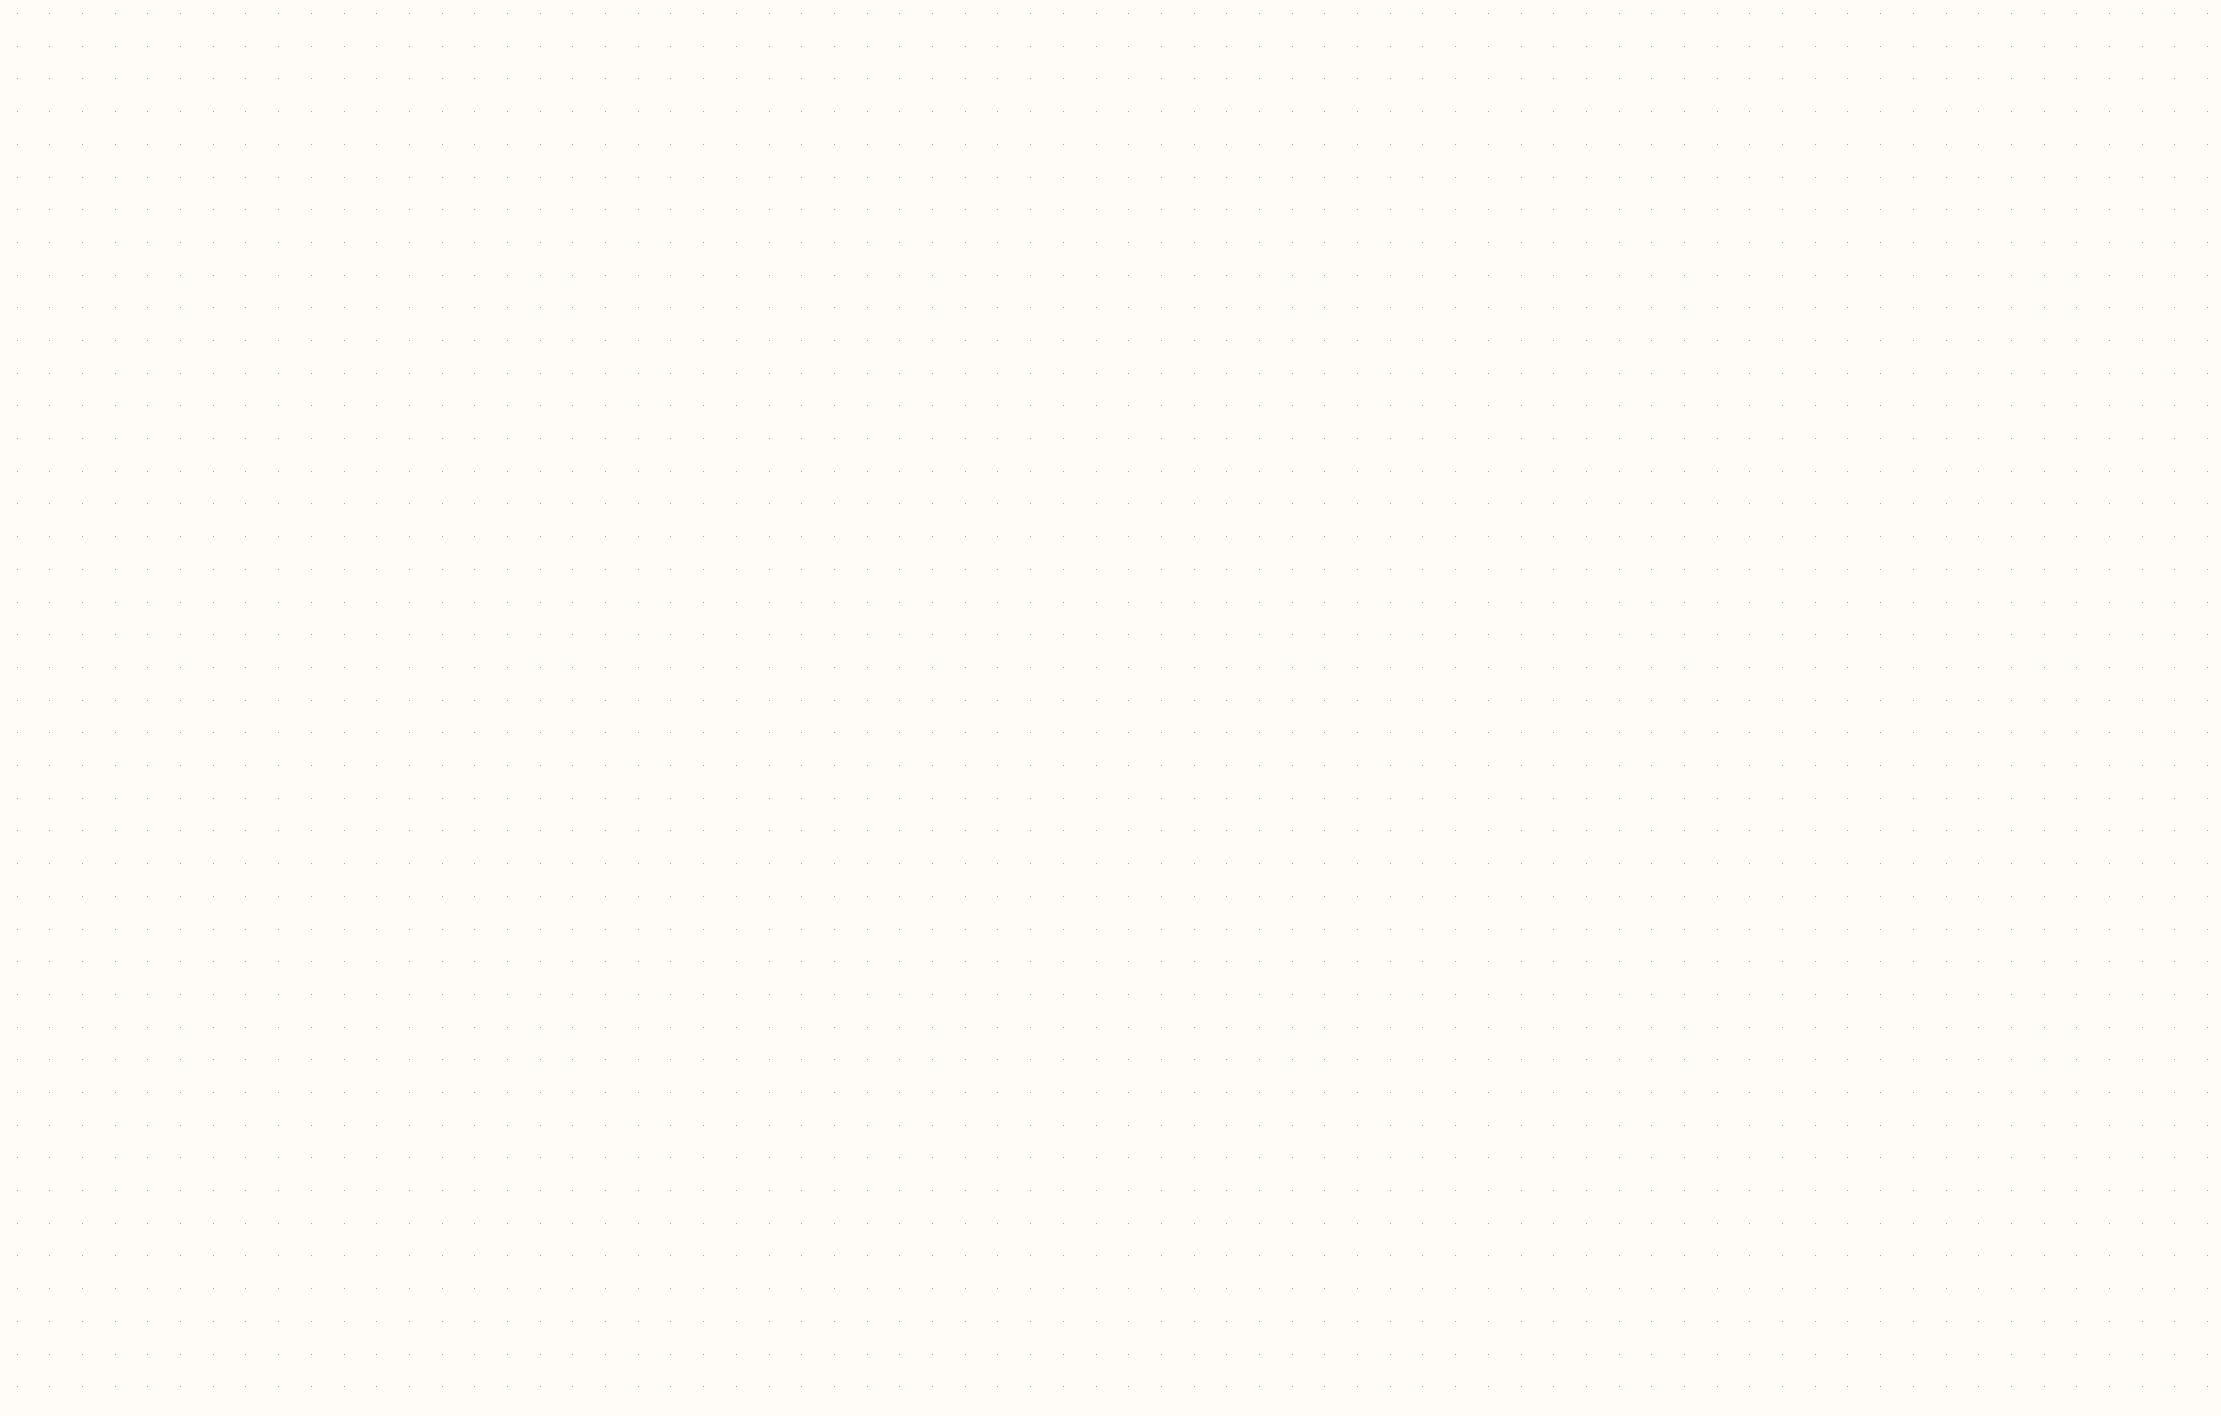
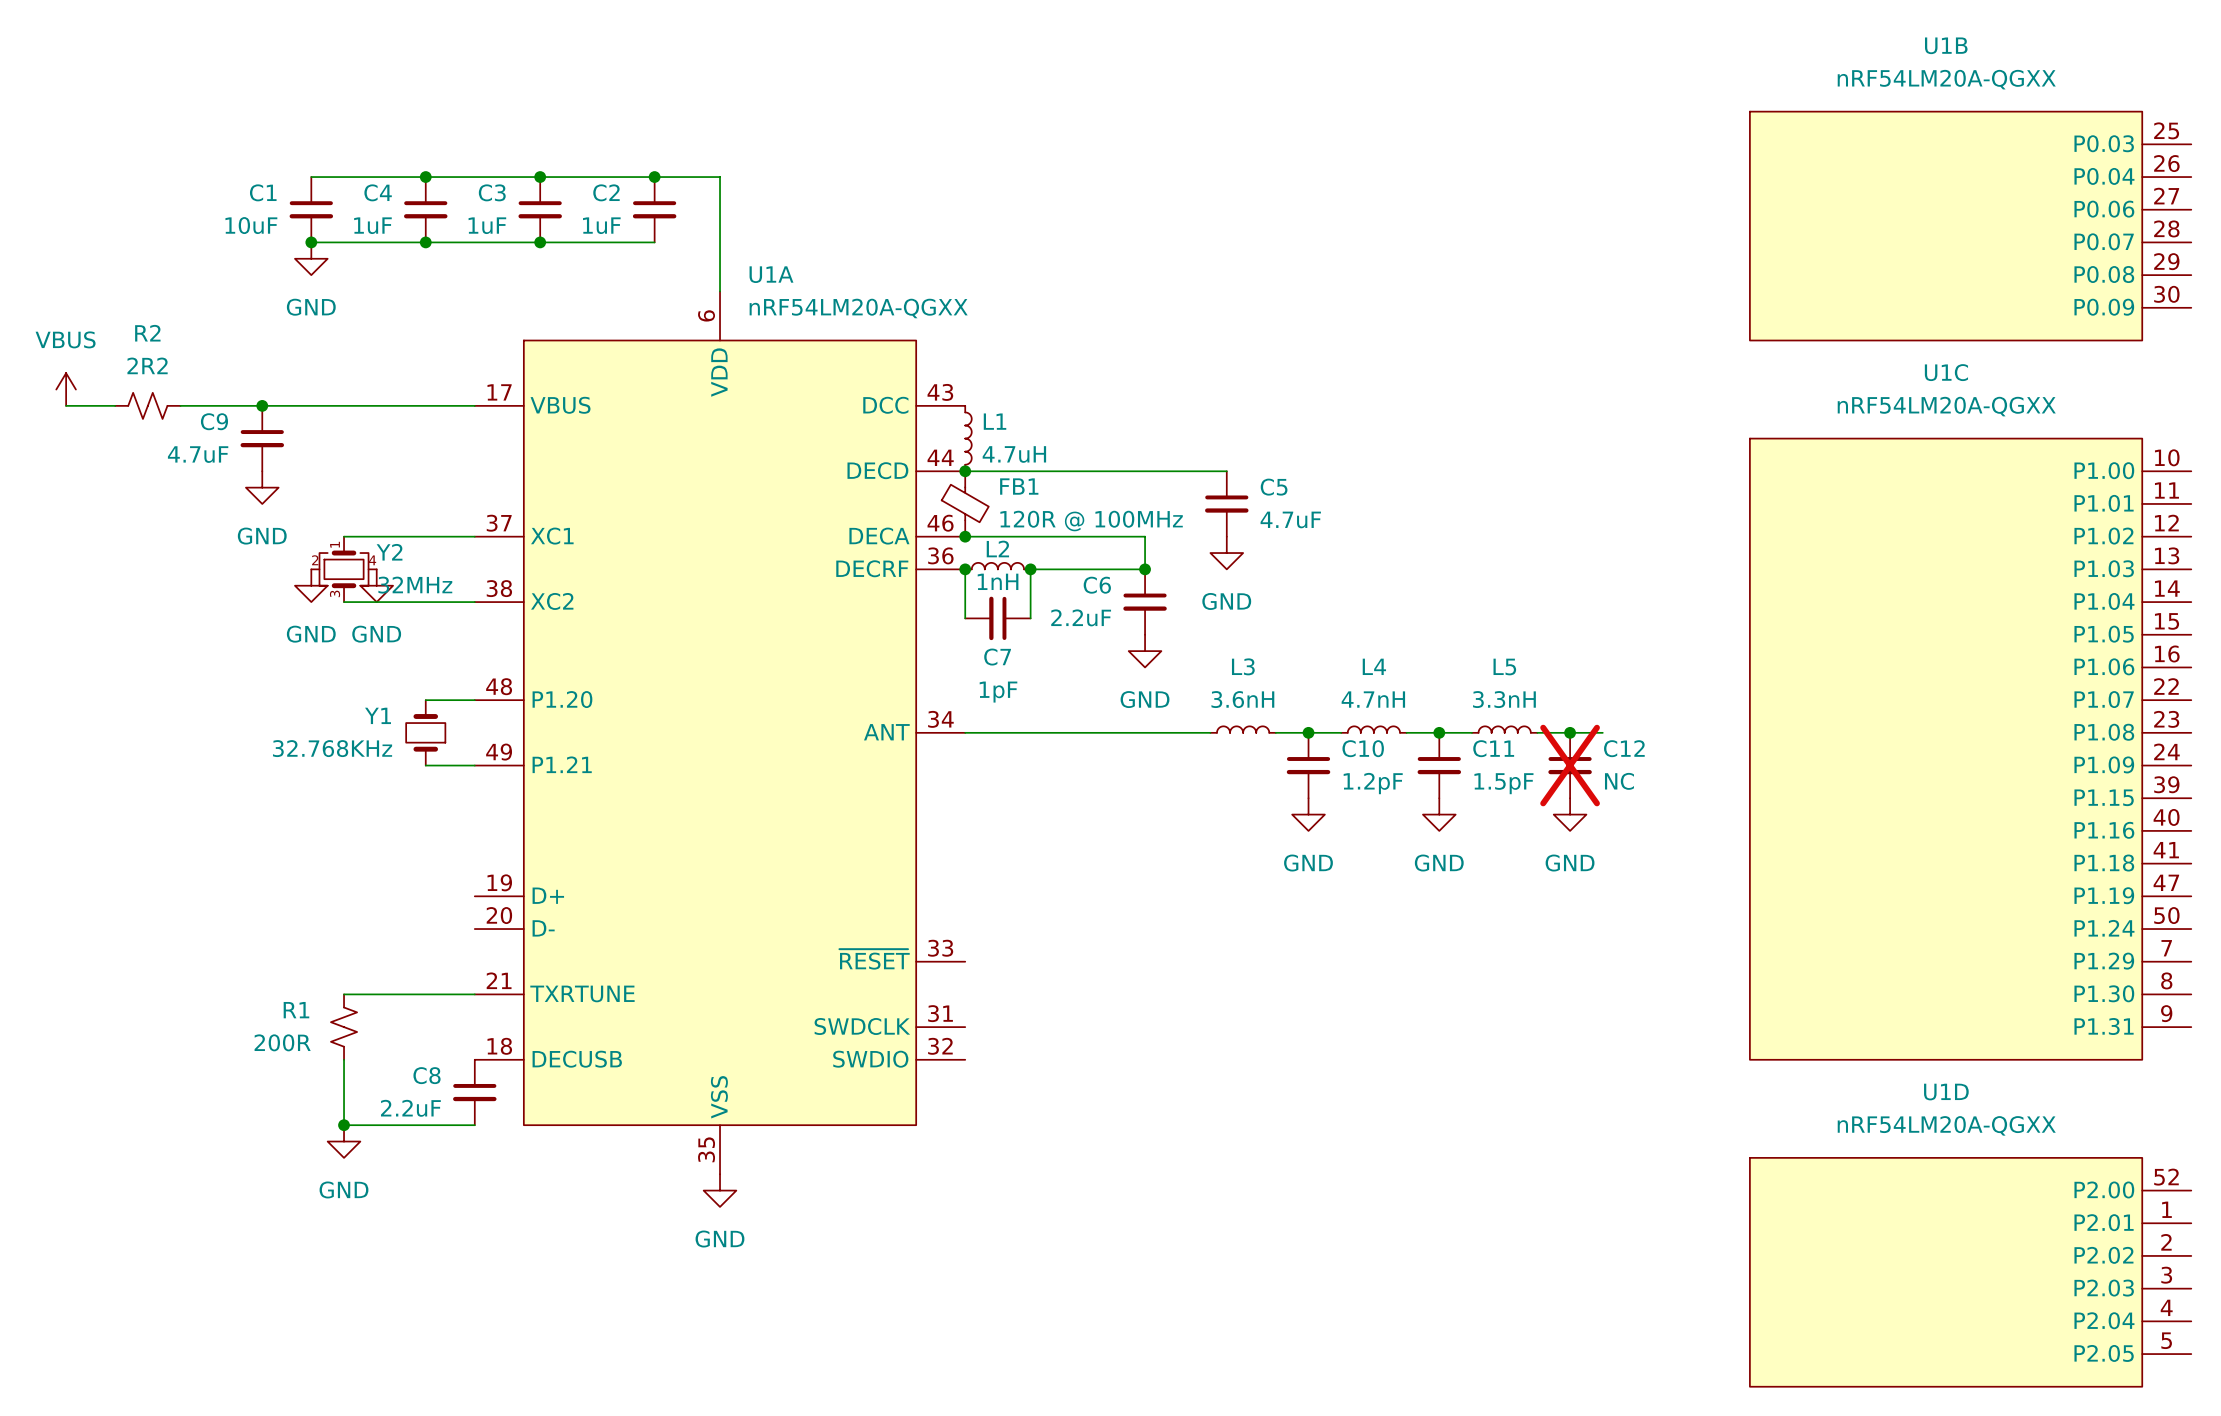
wire: none -> (311, 177) (720, 177) (720, 291)
junction: none -> (425, 177)
junction: none -> (540, 177)
junction: none -> (654, 177)
C1: none -> 10uF (311, 209)
C4: none -> 1uF (425, 209)
C3: none -> 1uF (540, 209)
C2: none -> 1uF (654, 209)
U1B: none -> nRF54LM20A-QGXX (1970, 226)
wire: none -> (311, 242) (654, 242)
junction: none -> (311, 242)
junction: none -> (425, 242)
junction: none -> (540, 242)
power symbol: none -> GND (311, 258)
power symbol: none -> VBUS (66, 389)
wire: none -> (66, 405) (115, 405)
R2: none -> 2R2 (147, 405)
wire: none -> (180, 405) (474, 405)
junction: none -> (262, 405)
C9: none -> 4.7uF (262, 438)
L1: none -> 4.7uH (968, 438)
wire: none -> (965, 471) (1226, 471)
junction: none -> (965, 471)
power symbol: none -> GND (262, 487)
FB1: none -> 120R @ 100MHz (965, 503)
C5: none -> 4.7uF (1226, 503)
wire: none -> (344, 536) (474, 536)
wire: none -> (965, 536) (1145, 536) (1145, 569) (1030, 569) (1030, 618)
junction: none -> (965, 536)
power symbol: none -> GND (1226, 553)
L2: none -> 1nH (997, 566)
Y2: none -> 32MHz (344, 569)
wire: none -> (965, 569) (965, 618)
junction: none -> (965, 569)
junction: none -> (1030, 569)
junction: none -> (1145, 569)
power symbol: none -> GND (311, 585)
power symbol: none -> GND (376, 585)
wire: none -> (344, 602) (474, 602)
C6: none -> 2.2uF (1145, 602)
C7: none -> 1pF (997, 618)
power symbol: none -> GND (1145, 651)
wire: none -> (425, 700) (474, 700)
L3: none -> 3.6nH (1243, 729)
L4: none -> 4.7nH (1373, 729)
L5: none -> 3.3nH (1504, 729)
Y1: none -> 32.768KHz (425, 732)
U1A: none -> nRF54LM20A-QGXX (720, 732)
wire: none -> (965, 732) (1210, 732)
wire: none -> (1275, 732) (1341, 732)
junction: none -> (1308, 732)
wire: none -> (1406, 732) (1471, 732)
junction: none -> (1439, 732)
wire: none -> (1537, 732) (1602, 732)
junction: none -> (1570, 732)
U1C: none -> nRF54LM20A-QGXX (1970, 749)
wire: none -> (425, 765) (474, 765)
C10: none -> 1.2pF (1308, 765)
C11: none -> 1.5pF (1439, 765)
C12: none -> NC (1570, 765)
power symbol: none -> GND (1308, 814)
power symbol: none -> GND (1439, 814)
power symbol: none -> GND (1570, 814)
wire: none -> (344, 994) (474, 994)
R1: none -> 200R (344, 1027)
wire: none -> (344, 1059) (344, 1125) (474, 1125)
C8: none -> 2.2uF (474, 1092)
junction: none -> (344, 1125)
power symbol: none -> GND (344, 1141)
power symbol: none -> GND (720, 1190)
U1D: none -> nRF54LM20A-QGXX (1970, 1272)

